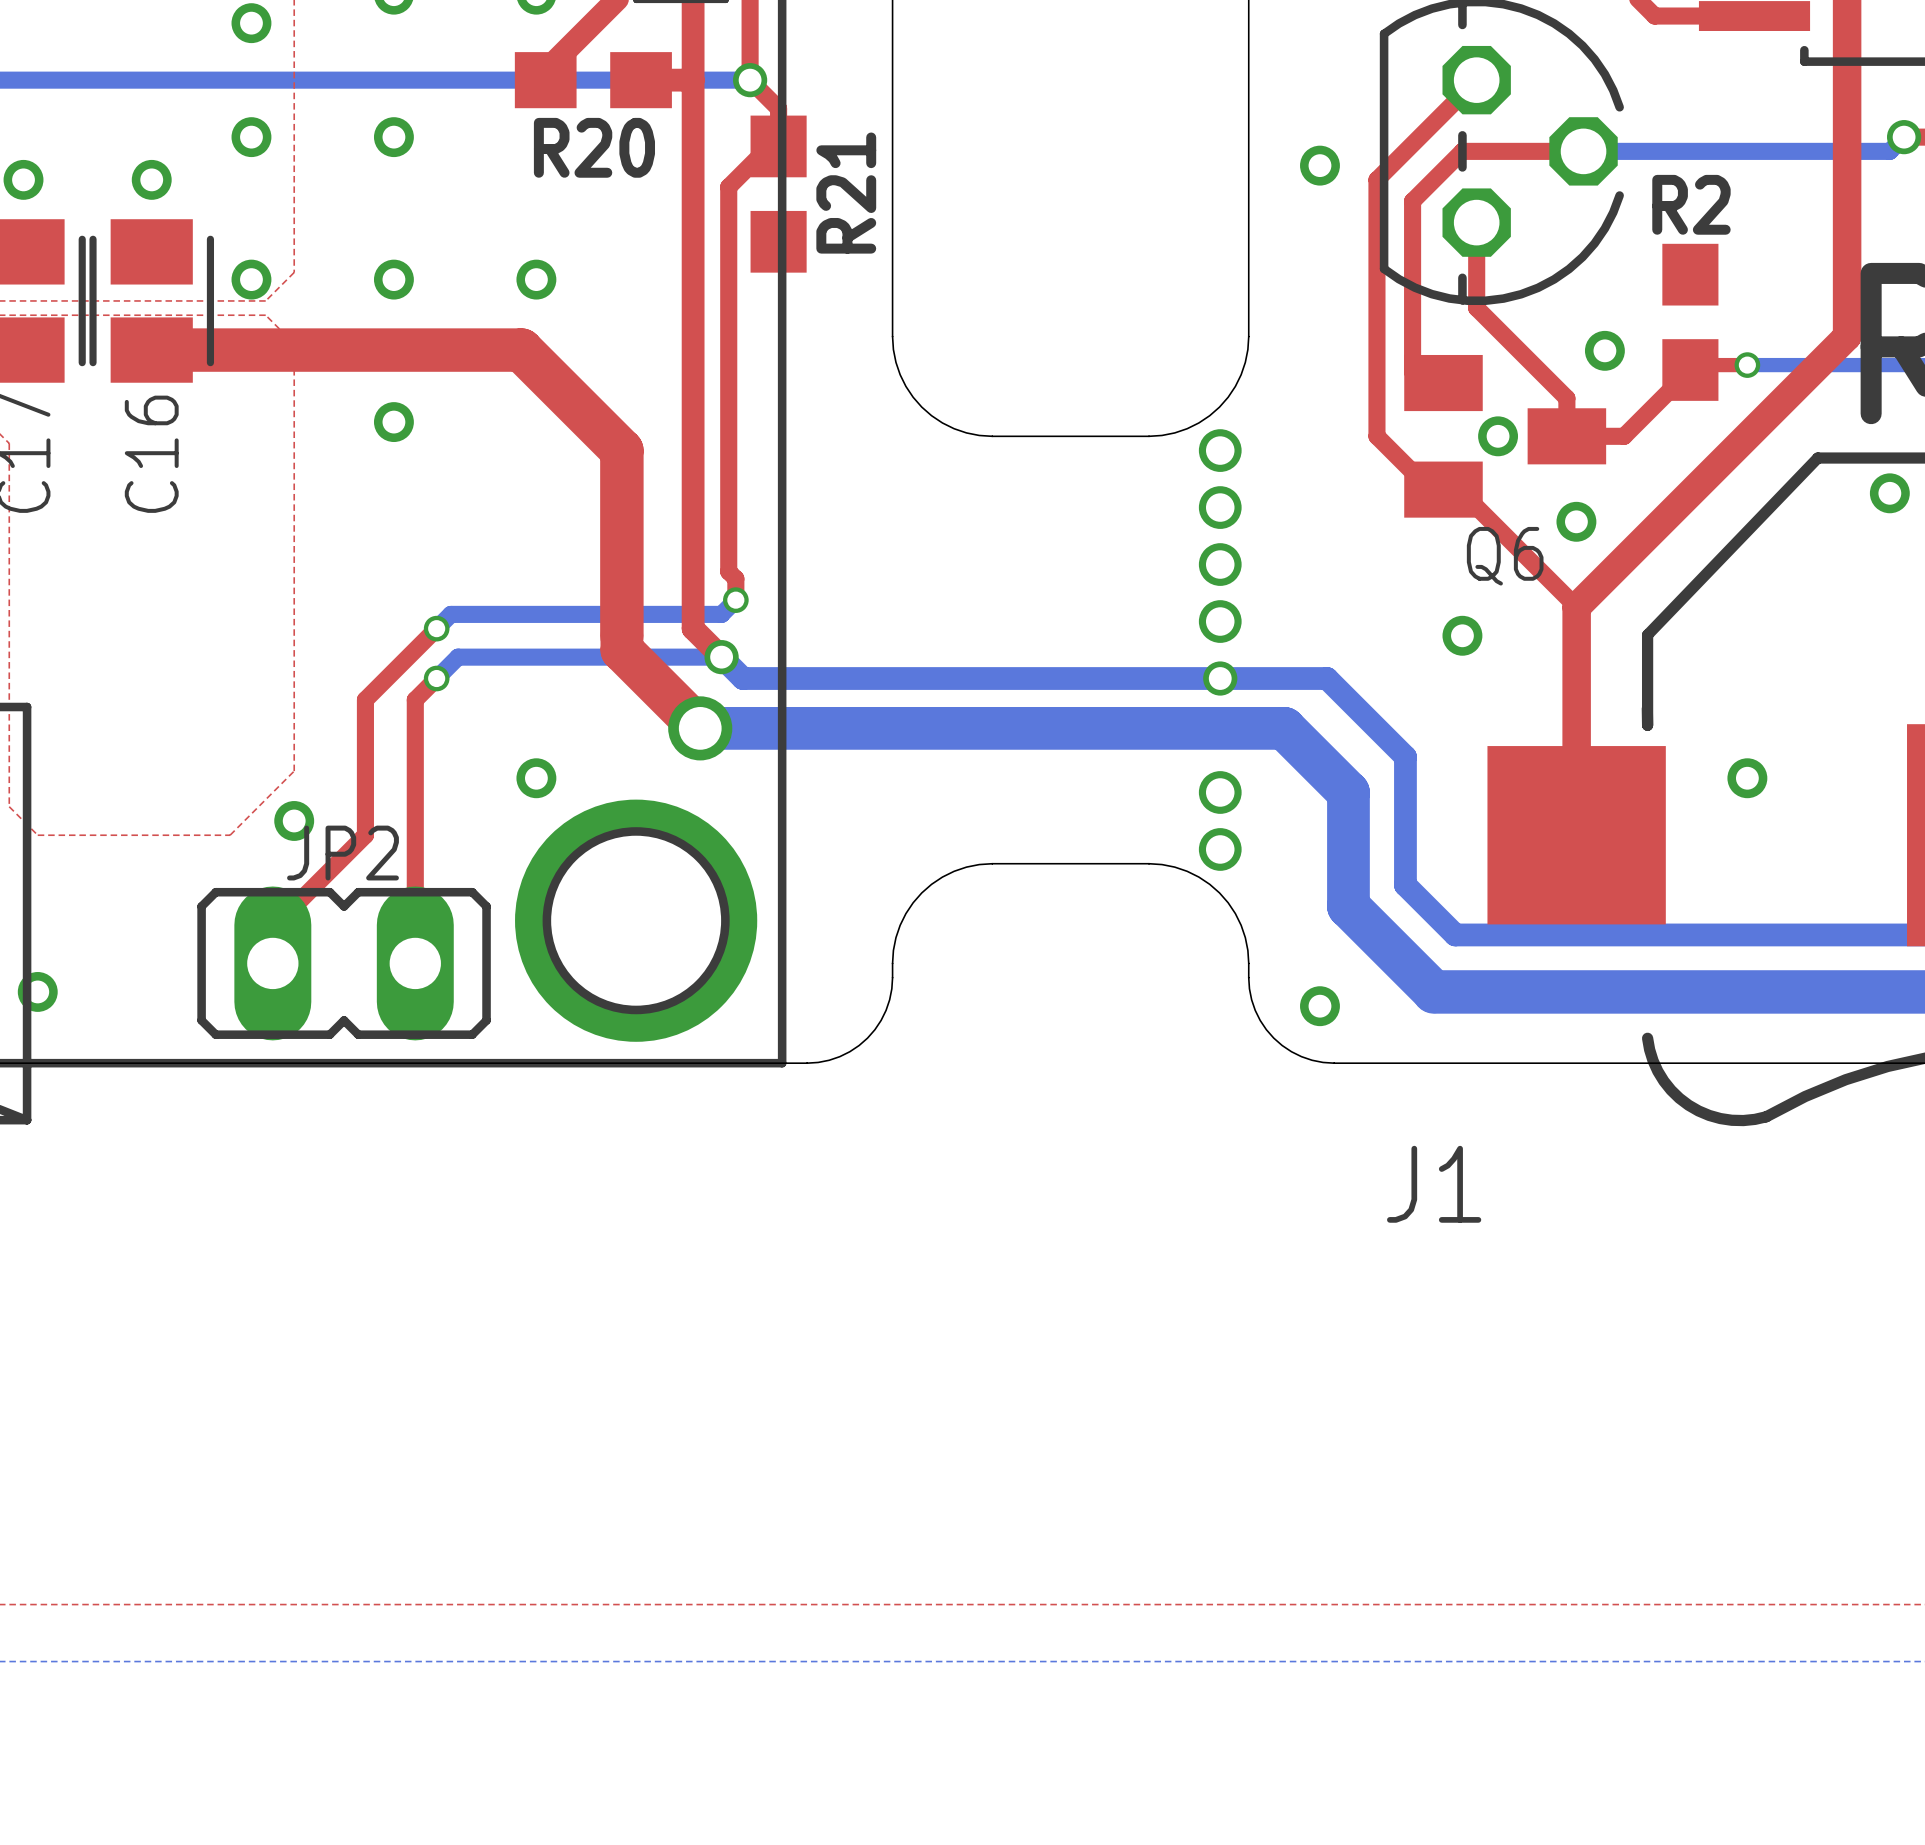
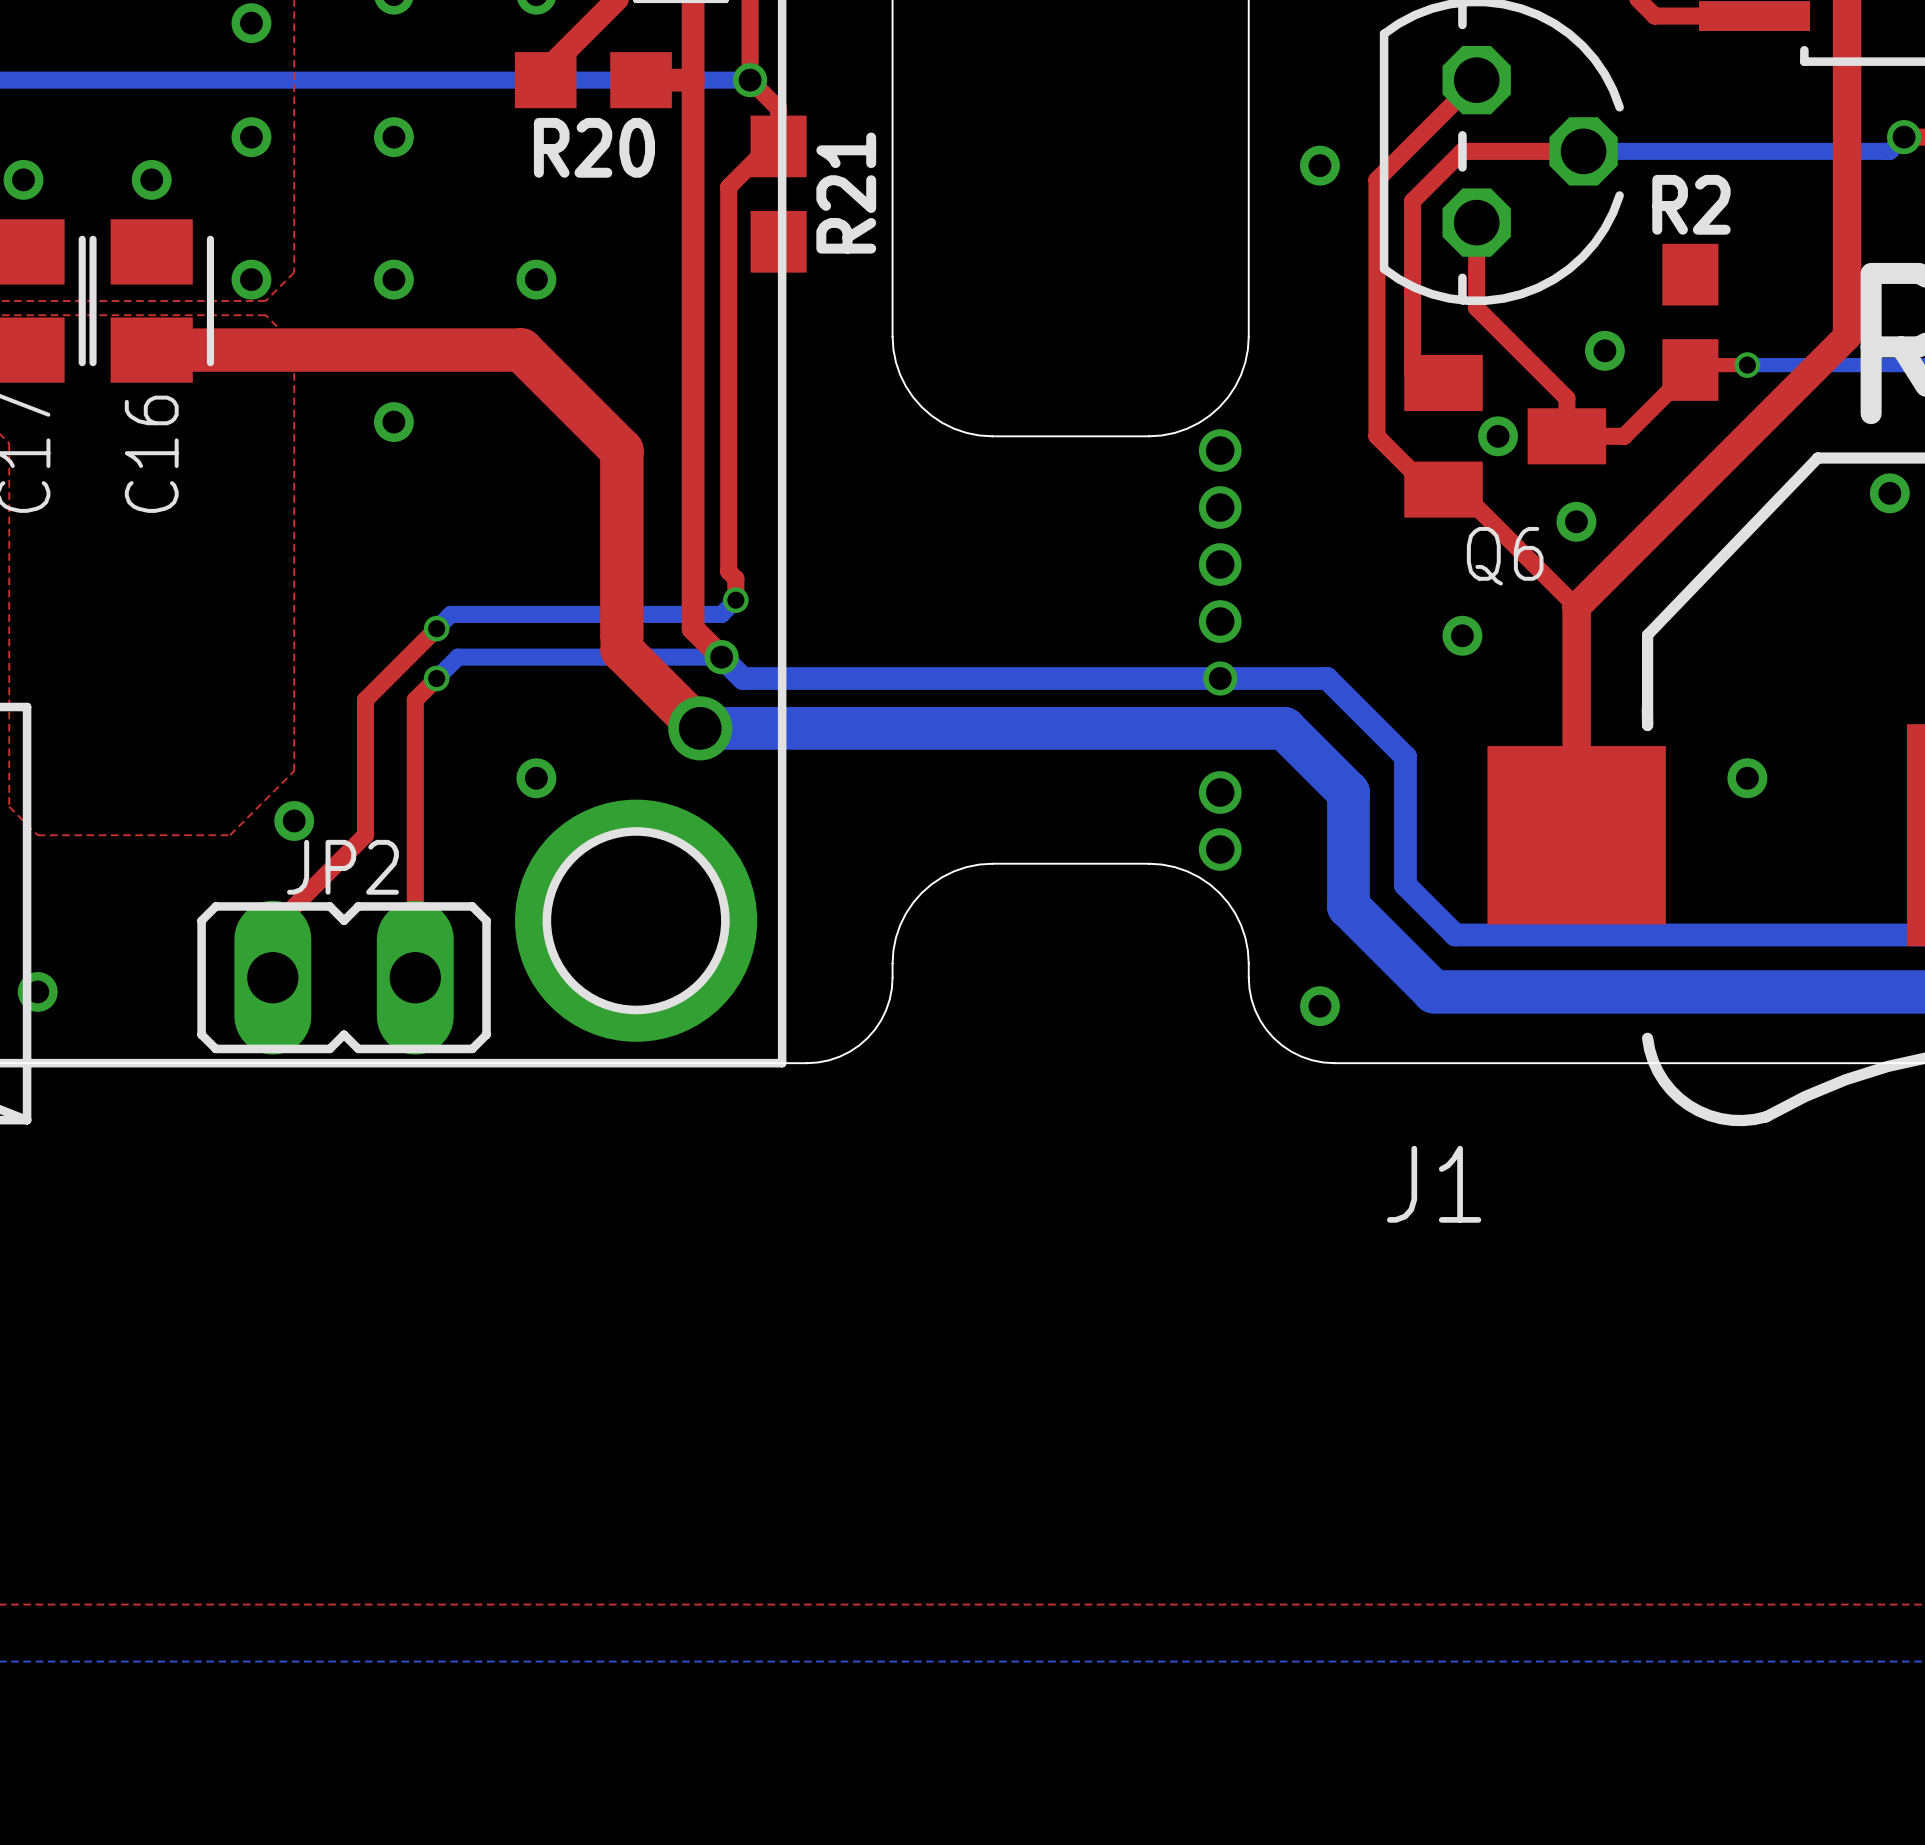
JP2 position: (344, 963) -> (344, 977)

